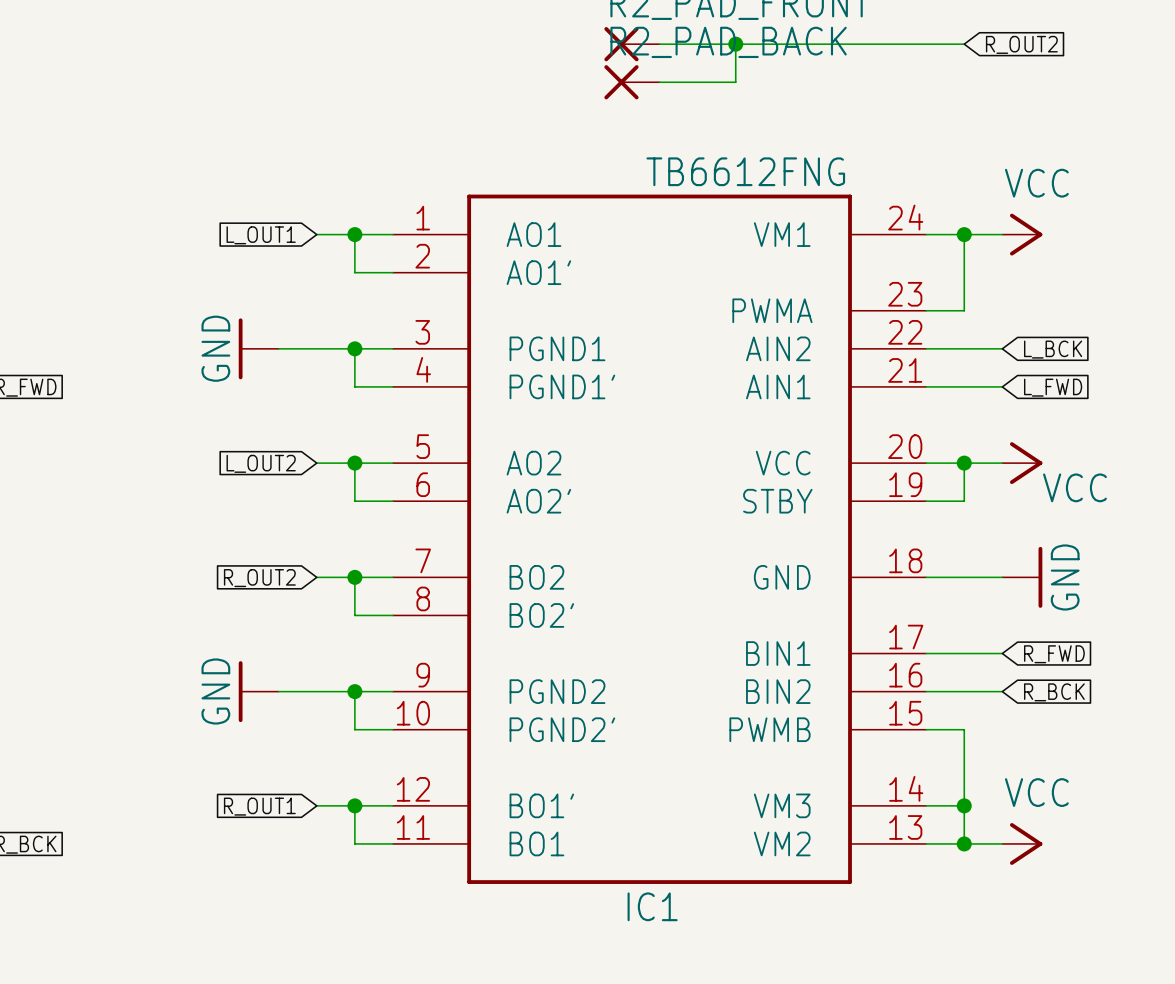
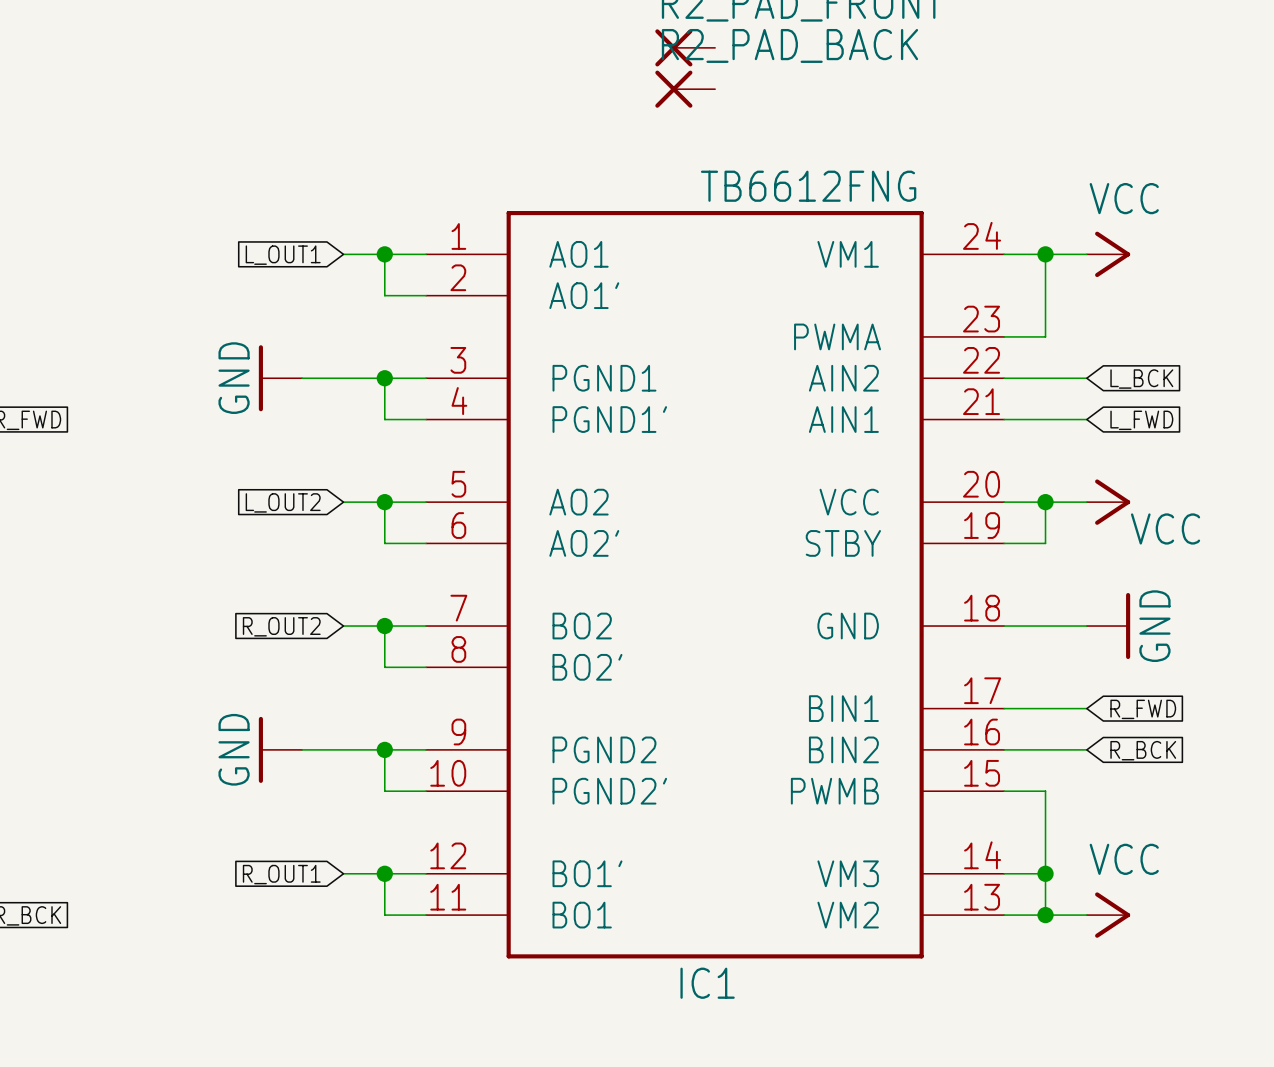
wire: (659, 44) (964, 44) -> none
wire: (735, 44) (735, 82) (659, 82) -> none
junction: (735, 44) -> none
global label: R_OUT2 (1021, 44) -> none

